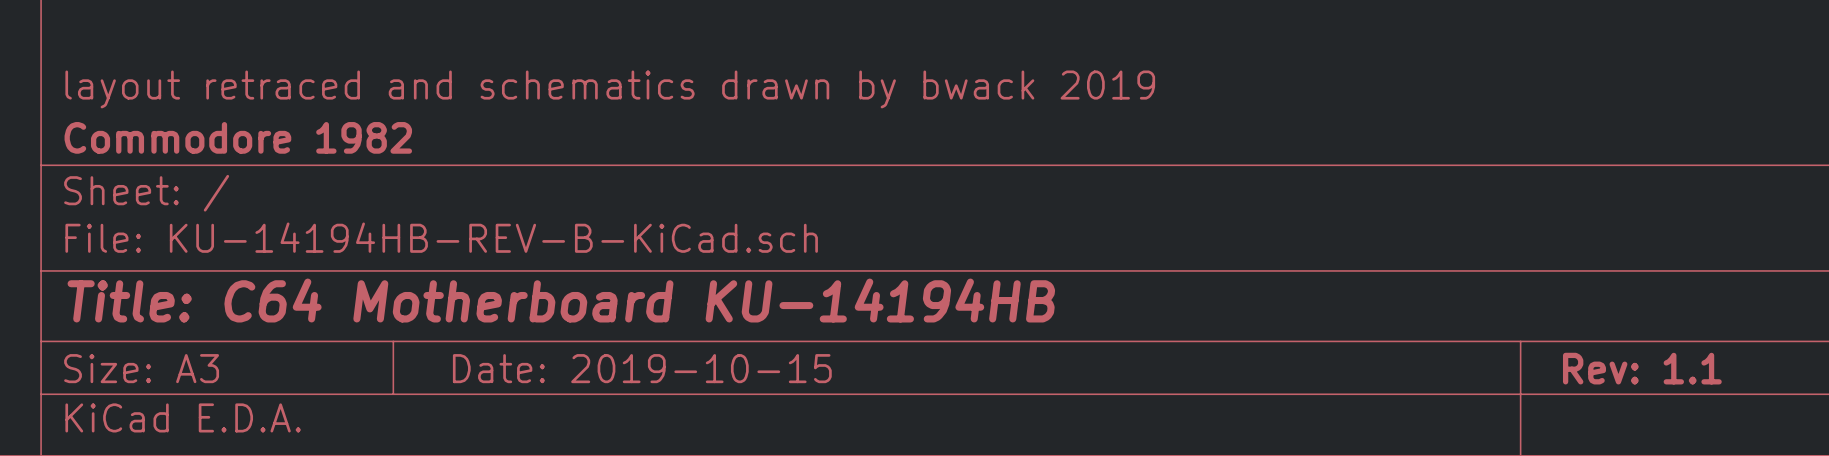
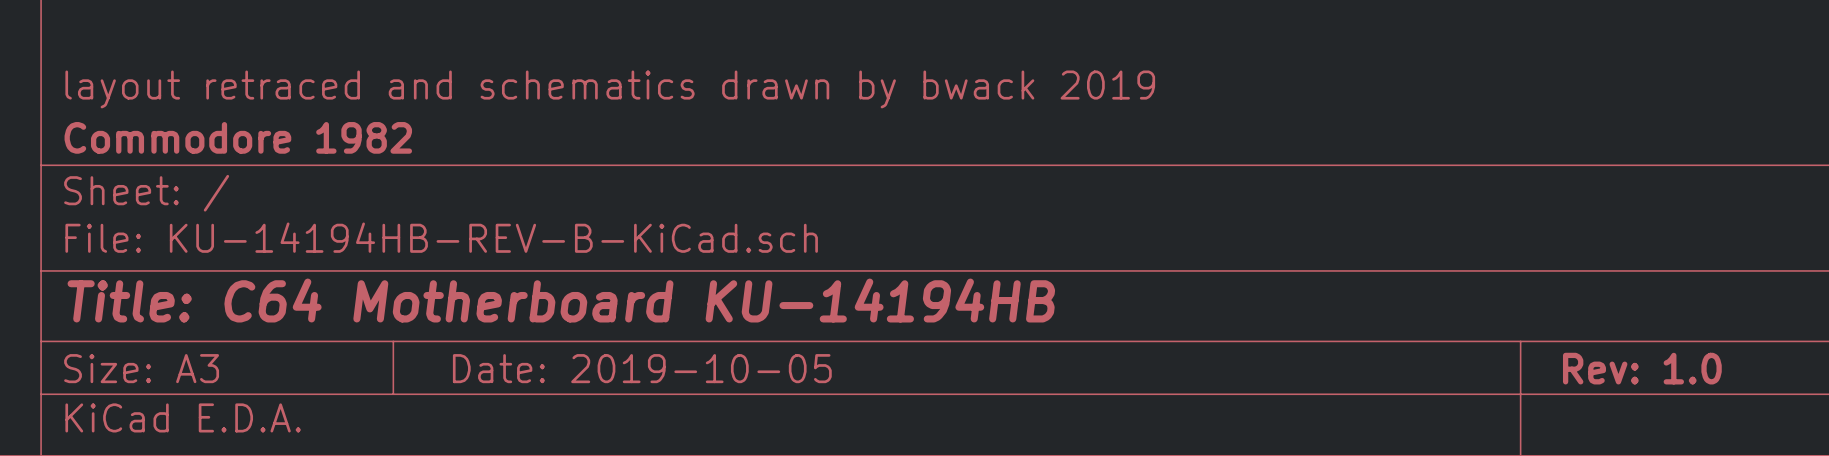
title block: Date: 2019-10-15 (642, 368) -> Date: 2019-10-05 (642, 368)
title block: Rev: 1.1 (1642, 368) -> Rev: 1.0 (1642, 368)

